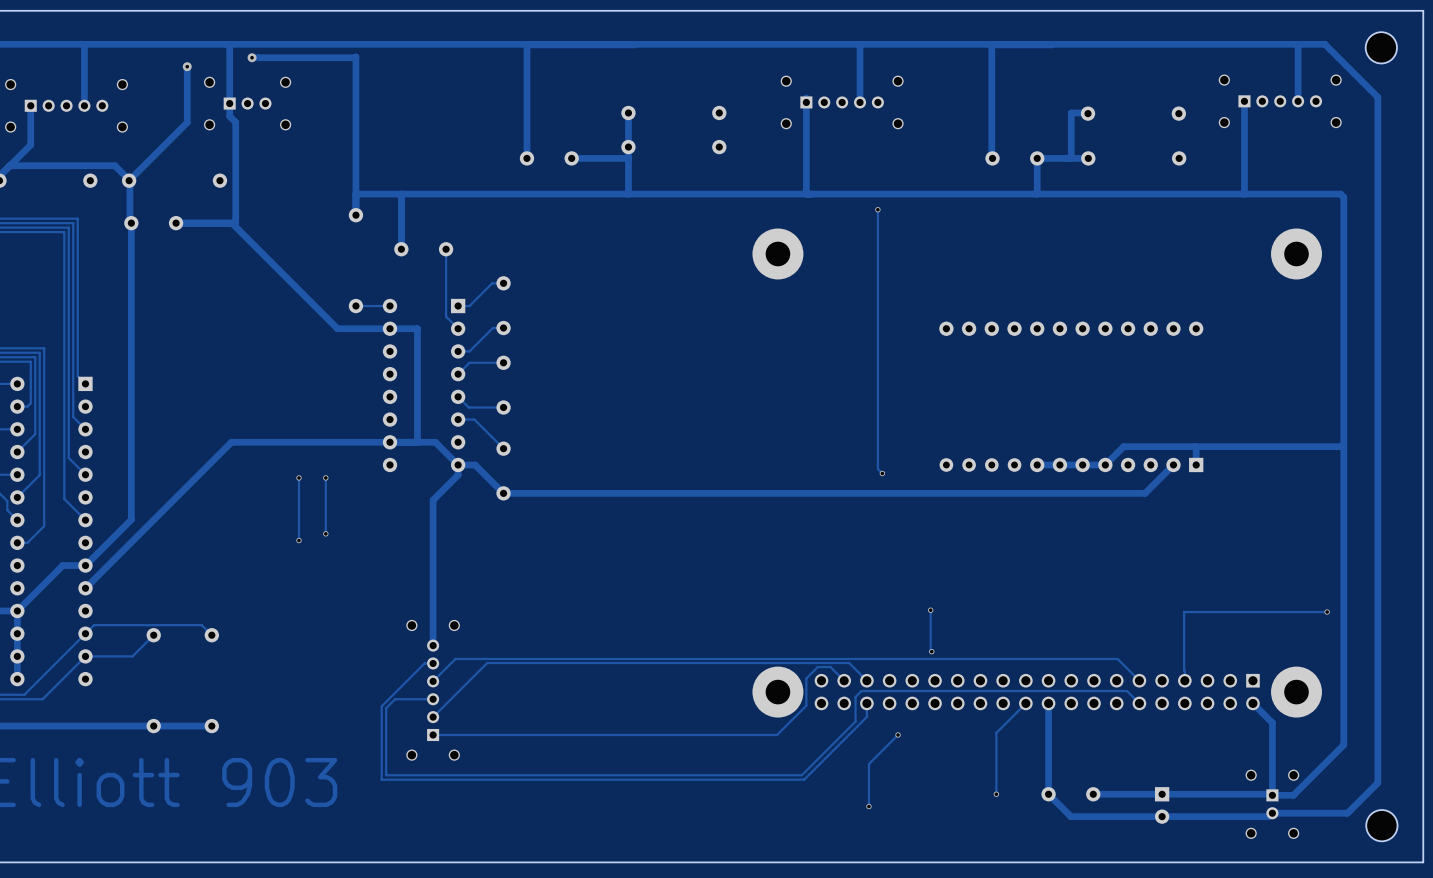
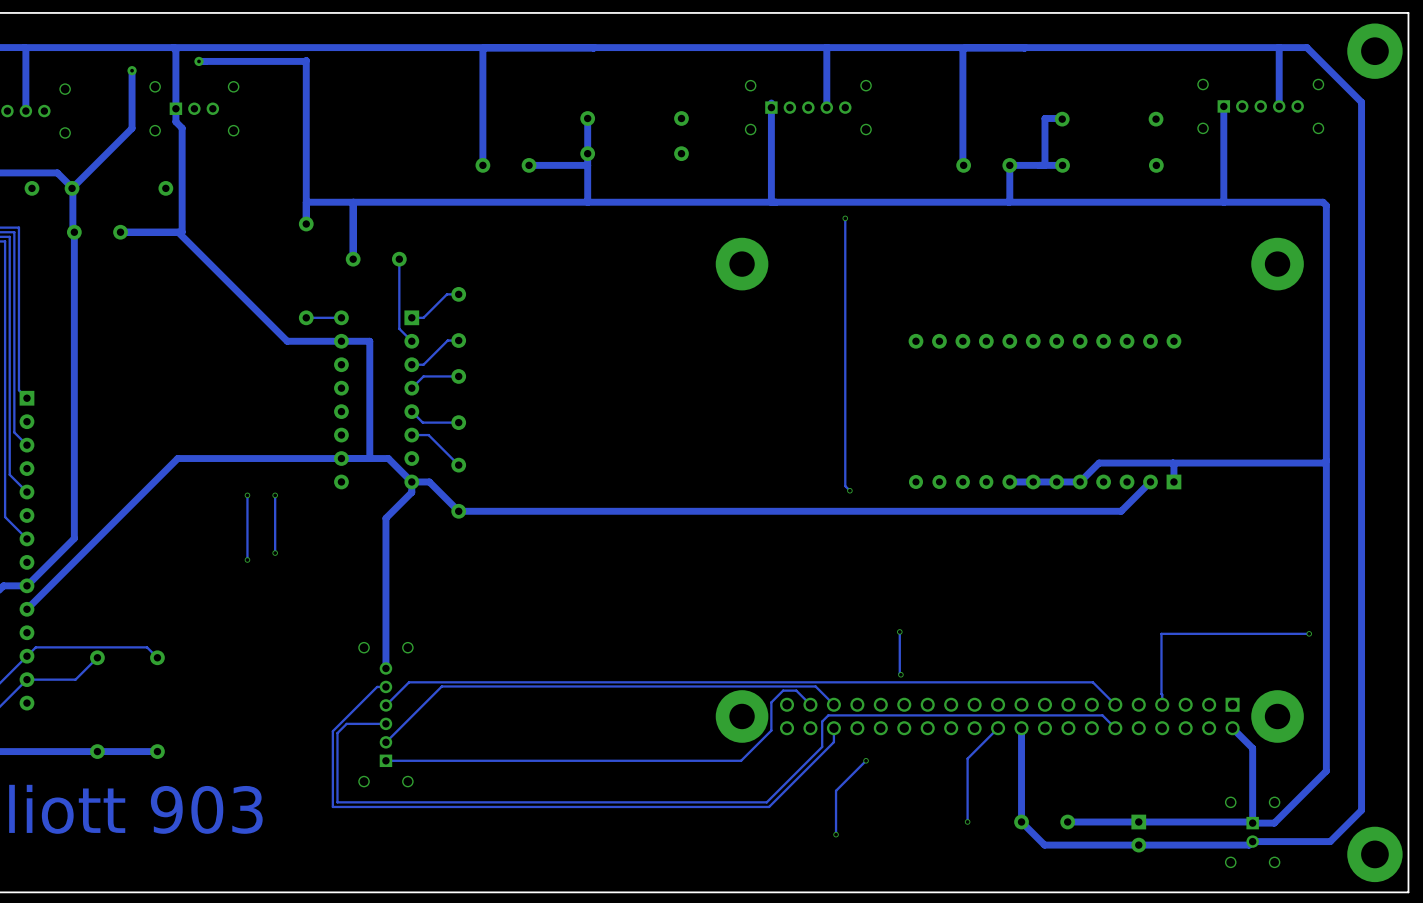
part: (1381, 47) -> none
part: none -> (1374, 51)
part footprint: [1366, 810, 1398, 842] -> [1347, 826, 1403, 883]

